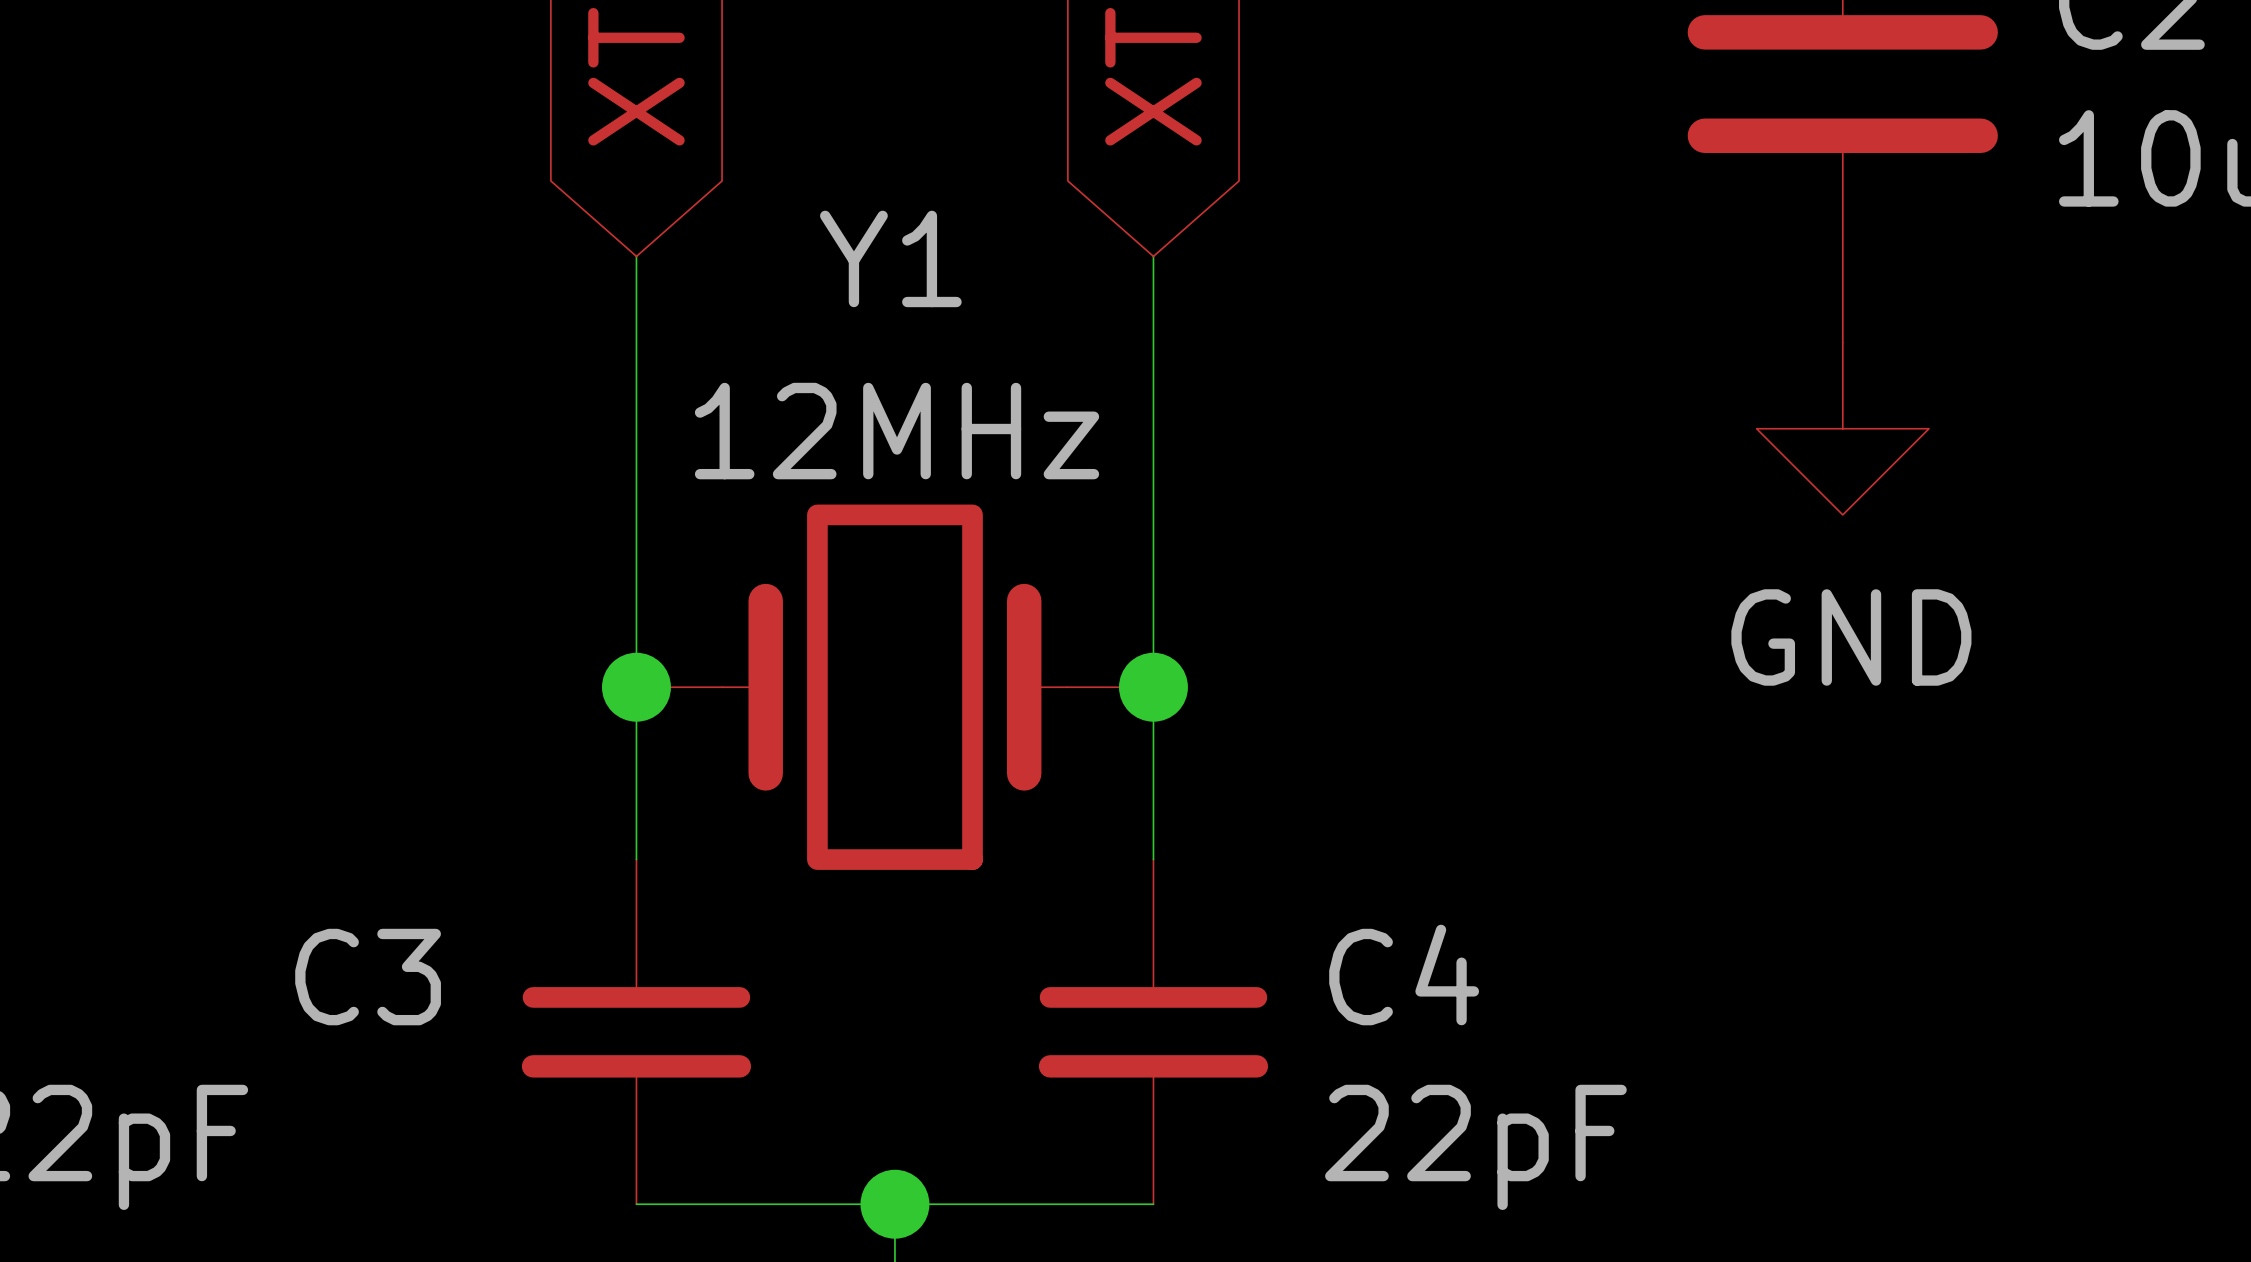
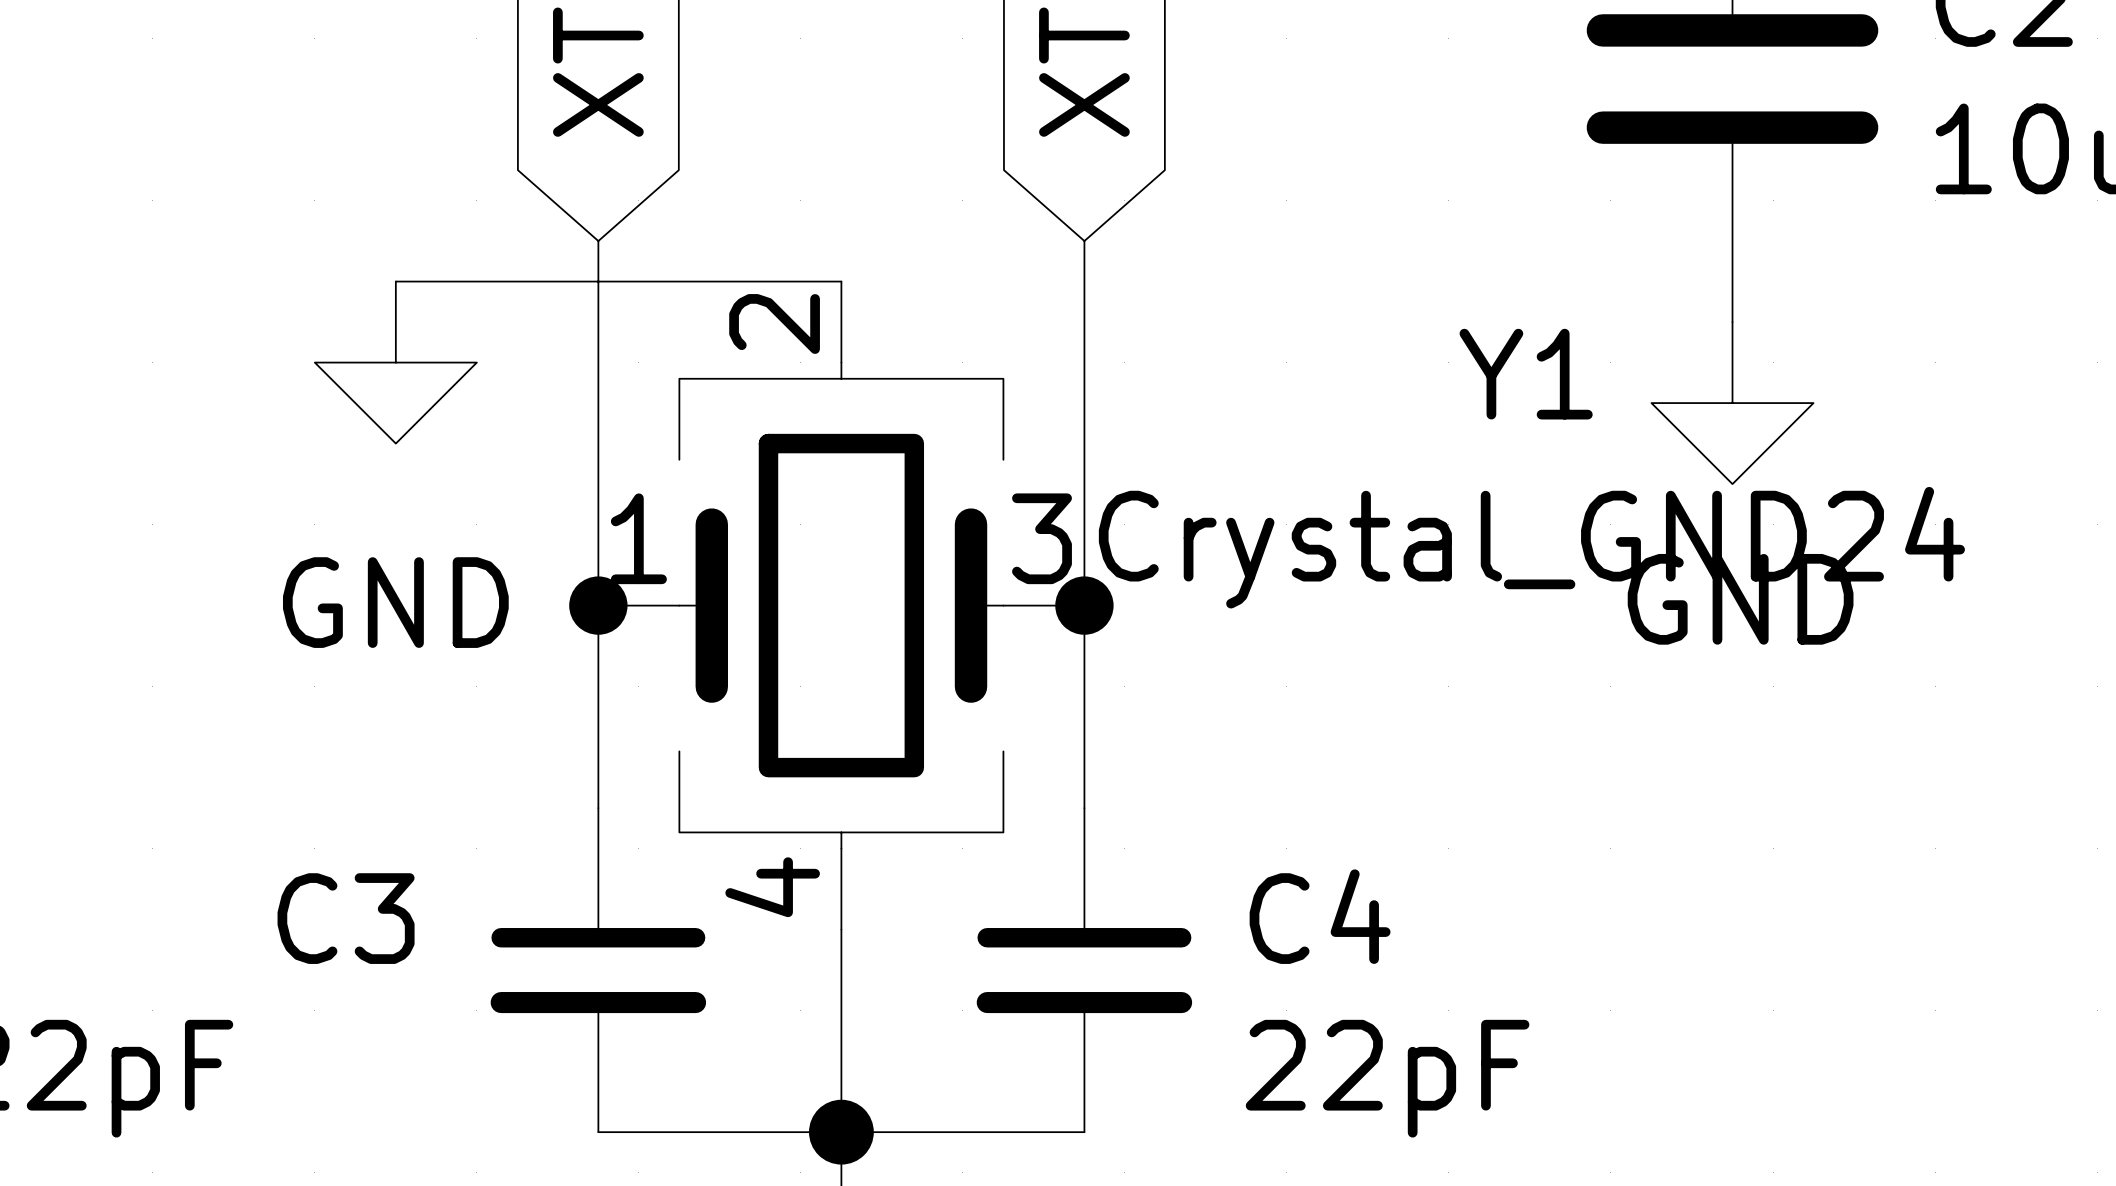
Y1 name position: Y1 (890, 258) -> Y1 (1526, 374)
wire: none -> (395, 281) (841, 281)
power symbol: none -> GND (395, 362)
Y1 value: 12MHz (897, 431) -> Crystal_GND24 (1531, 547)
Y1 symbol: [636, 504, 1154, 870] -> [598, 281, 1085, 930]
junction position: (636, 687) -> (598, 605)
junction position: (1153, 687) -> (1084, 605)
wire: none -> (841, 929) (841, 1132)

